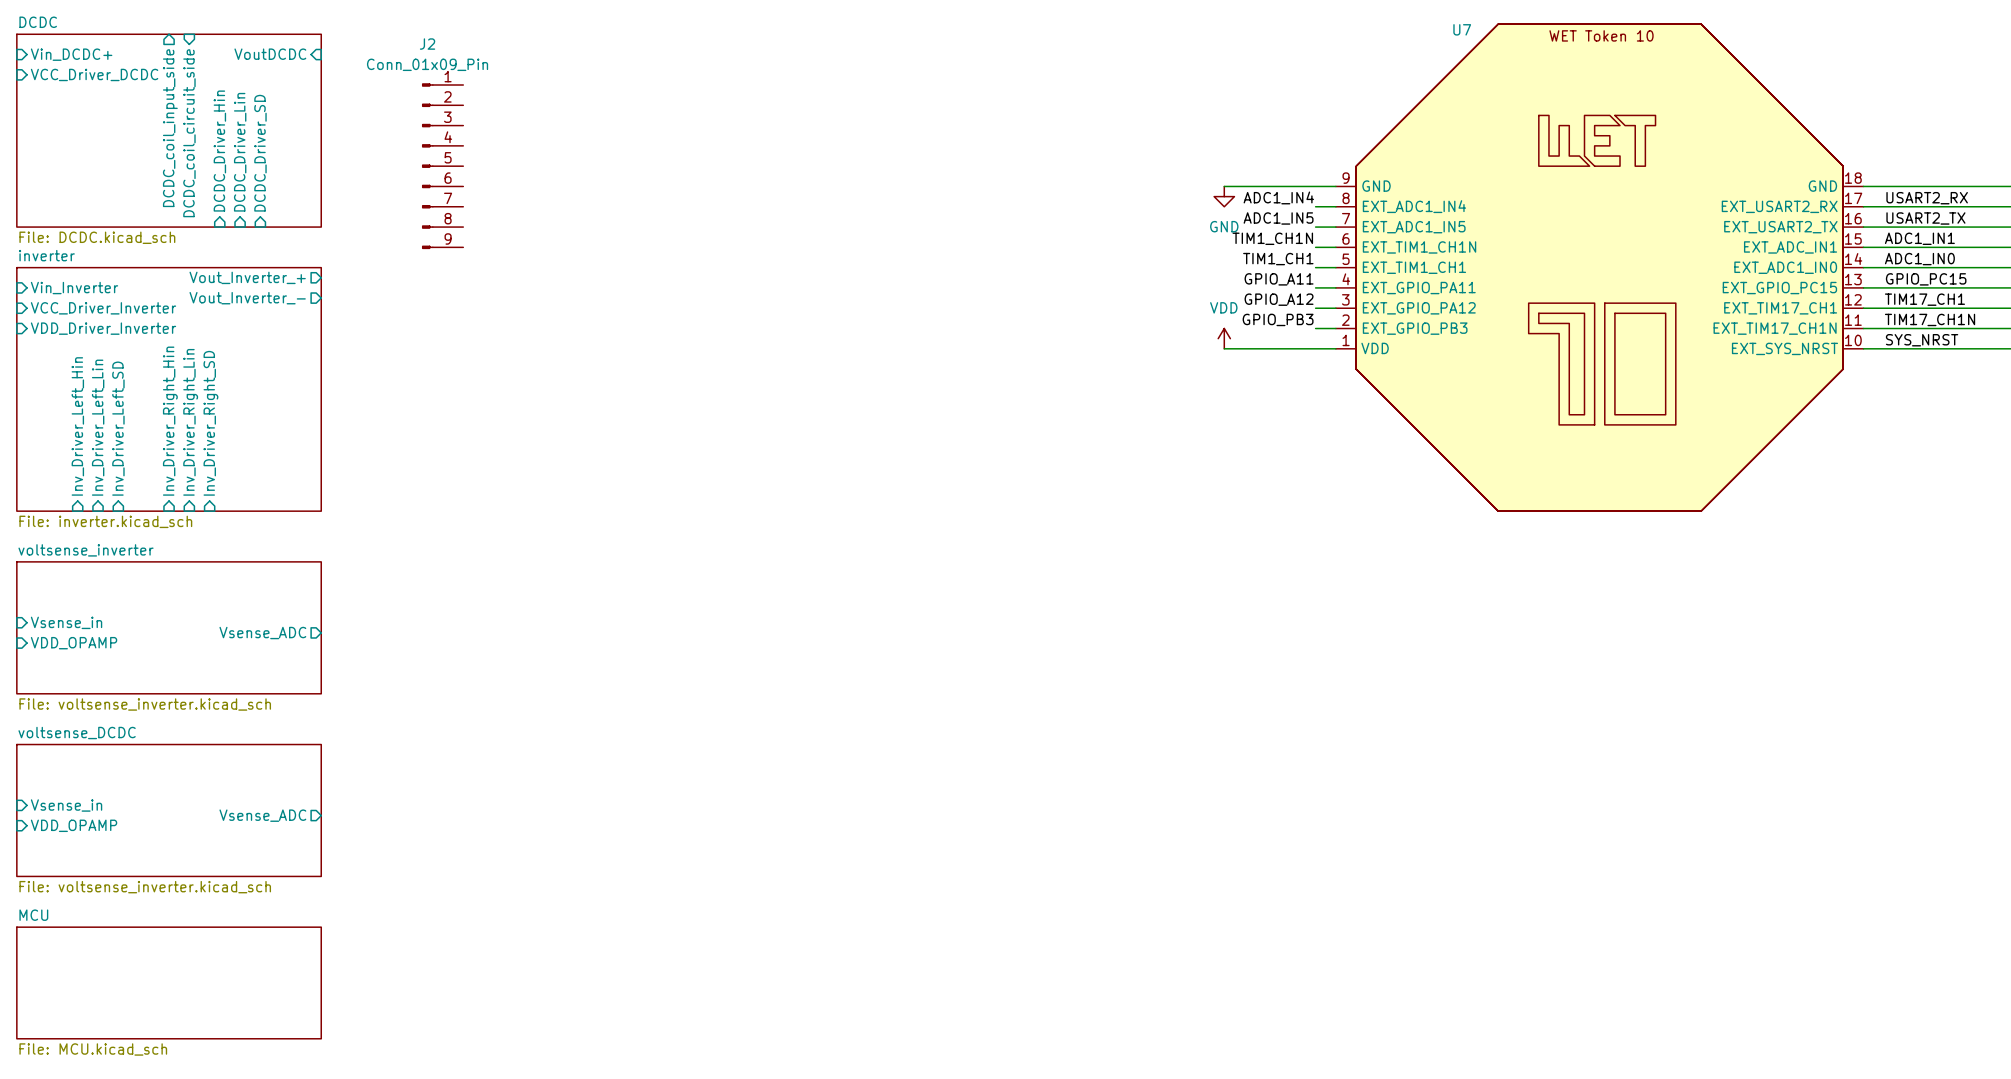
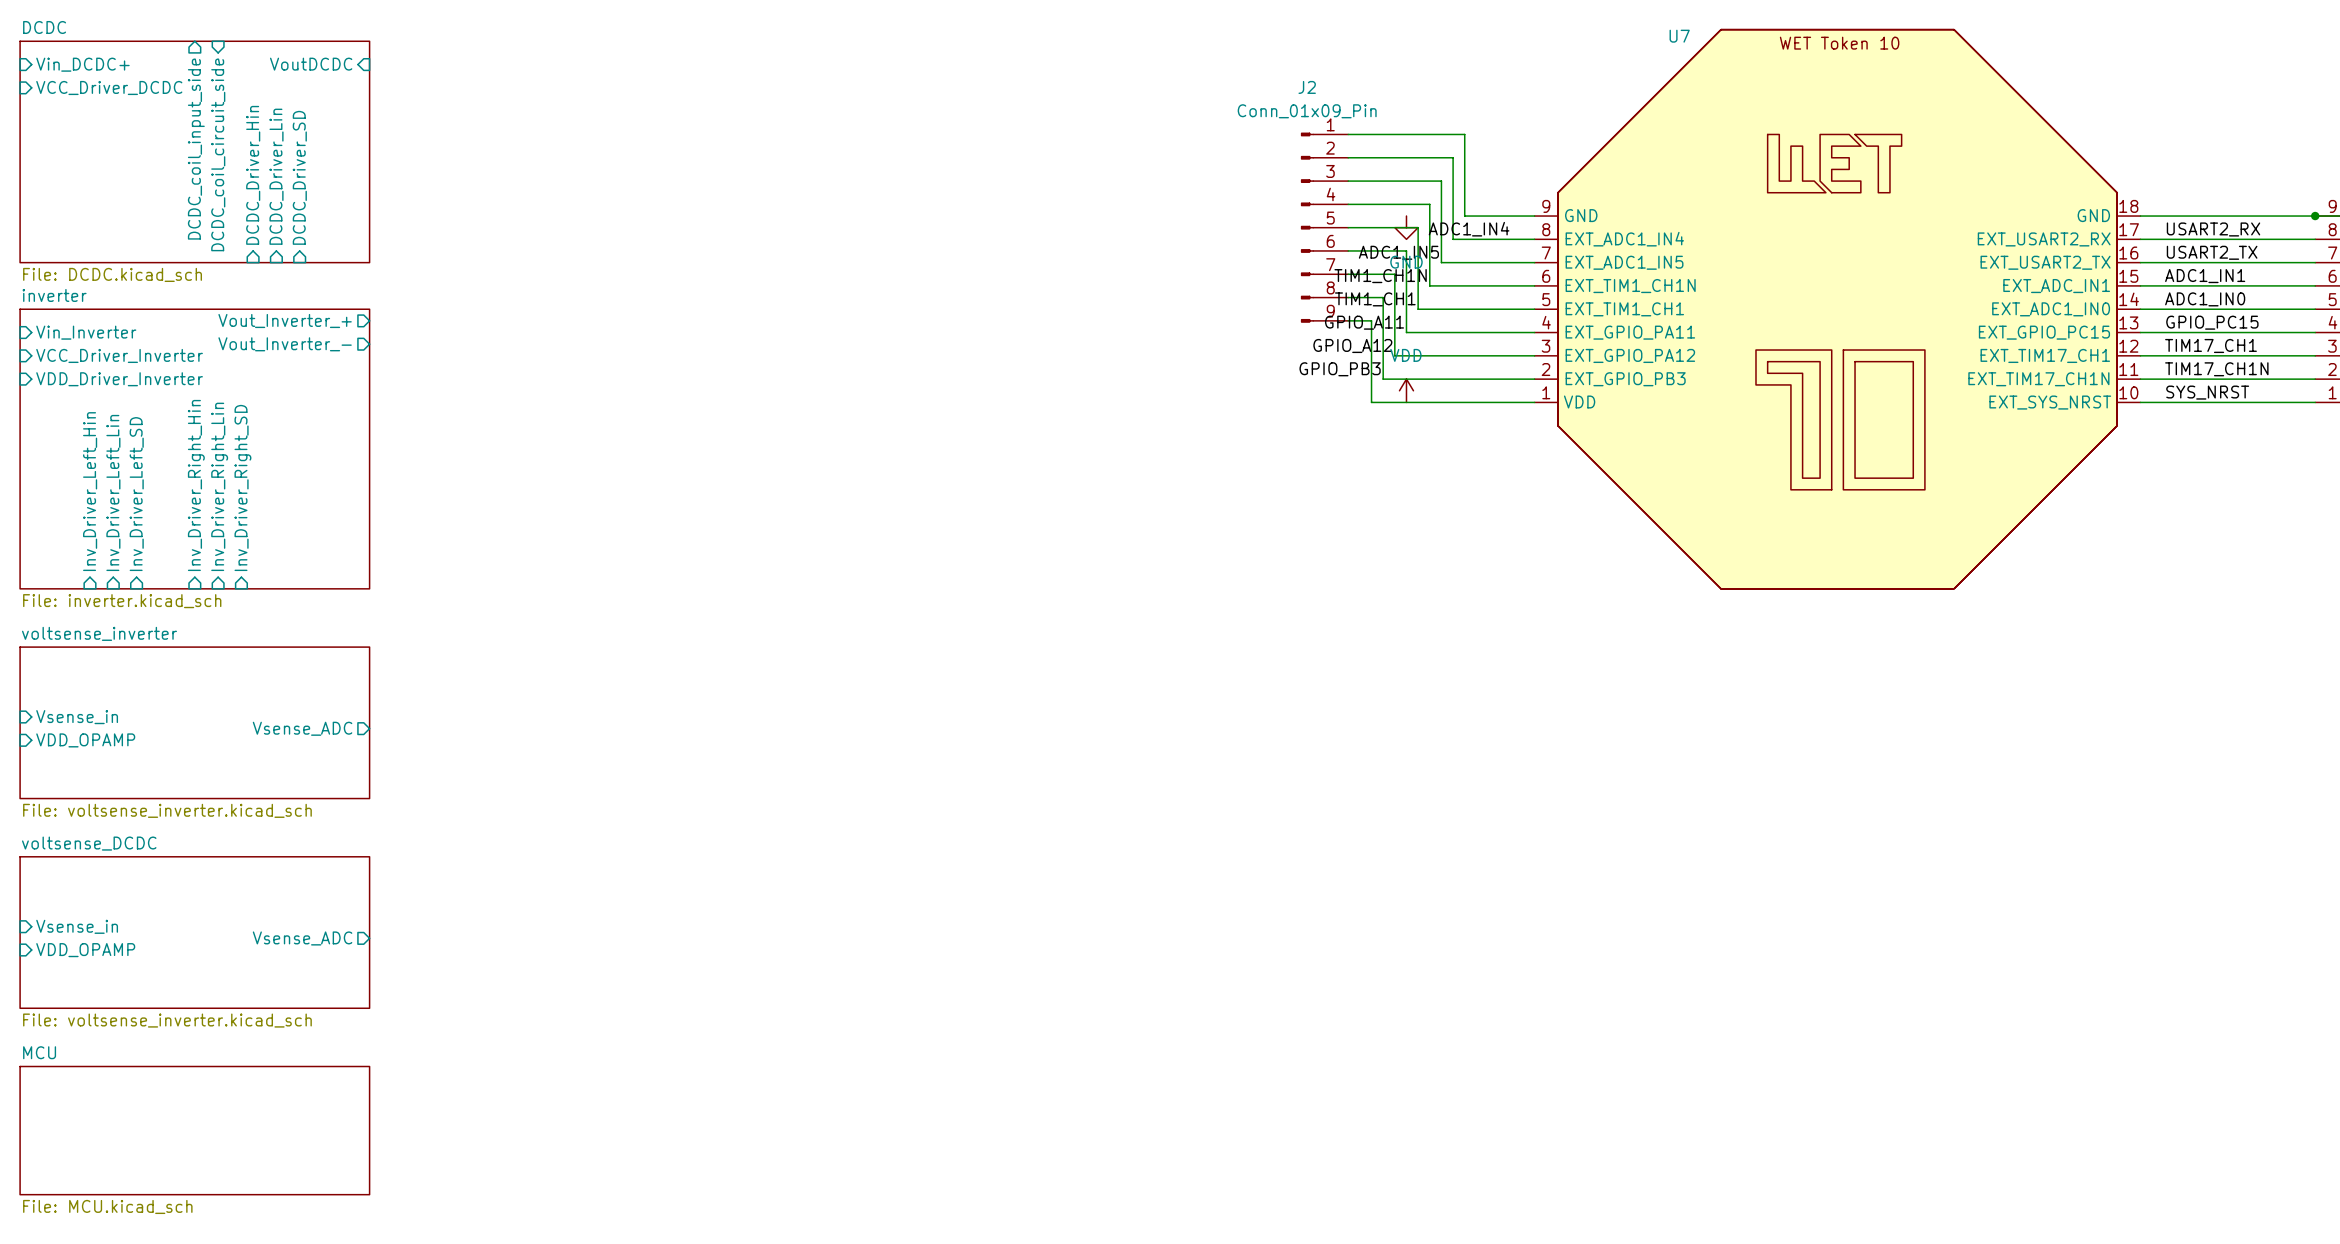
wire: none -> (1348, 157) (1453, 157) (1453, 239) (1511, 239)
wire: none -> (1348, 181) (1441, 181) (1441, 262) (1511, 262)
J2 position: (442, 166) -> (1324, 227)
wire: none -> (1348, 204) (1429, 204) (1429, 285) (1511, 285)
wire: (1224, 186) (1275, 186) -> (1348, 134) (1464, 134) (1464, 216)
wire: none -> (1348, 227) (1418, 227) (1418, 309) (1511, 309)
wire: none -> (1348, 250) (1406, 250) (1406, 332) (1511, 332)
label position: ADC1_IN5 (1278, 218) -> ADC1_IN5 (1398, 252)
wire: none -> (1348, 274) (1394, 274) (1394, 355) (1511, 355)
label position: TIM1_CH1N (1272, 238) -> TIM1_CH1N (1380, 276)
wire: none -> (1348, 297) (1383, 297) (1383, 379) (1511, 379)
label position: TIM1_CH1 (1278, 259) -> TIM1_CH1 (1375, 299)
wire: none -> (1348, 320) (1371, 320) (1371, 402) (1406, 402)
label position: GPIO_A11 (1279, 279) -> GPIO_A11 (1364, 322)
label position: GPIO_A12 (1279, 299) -> GPIO_A12 (1352, 345)
label position: GPIO_PB3 (1278, 319) -> GPIO_PB3 (1340, 369)

